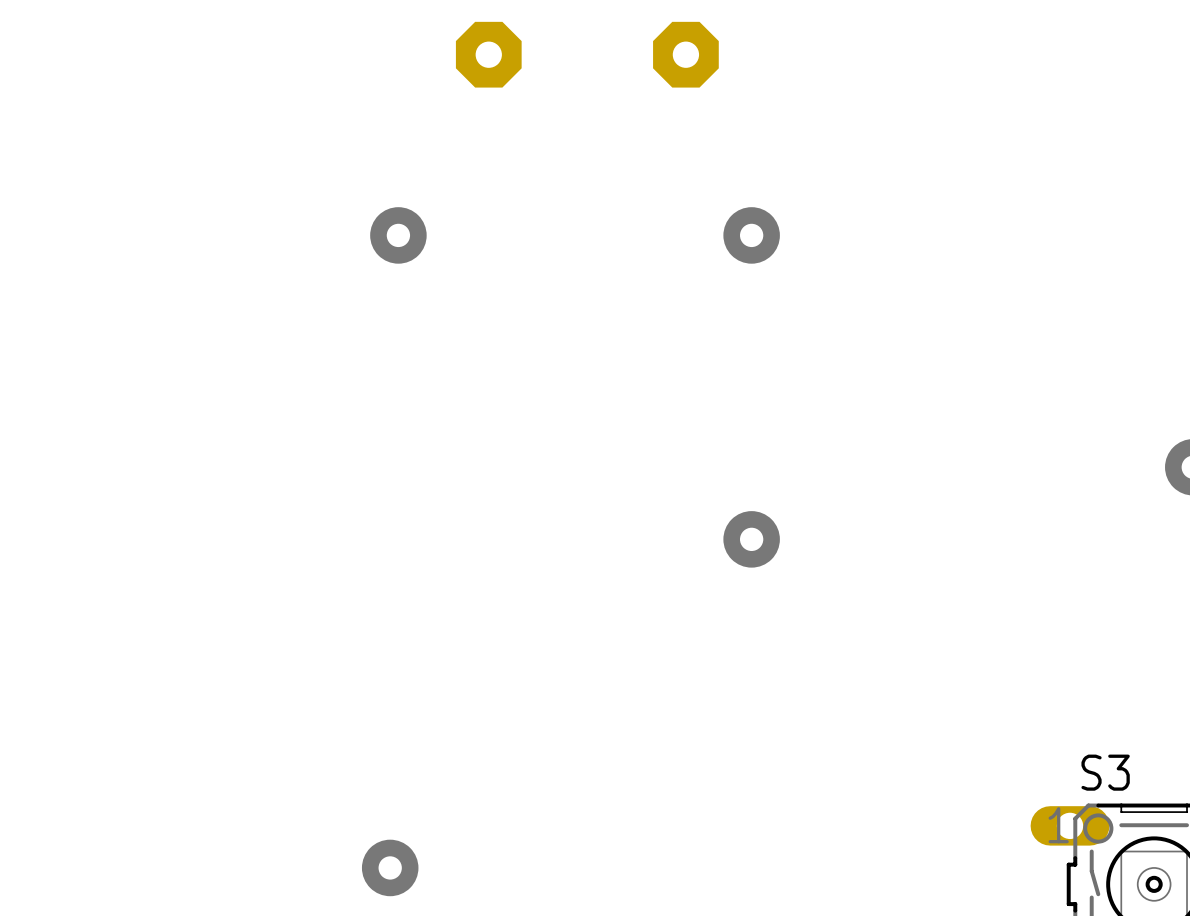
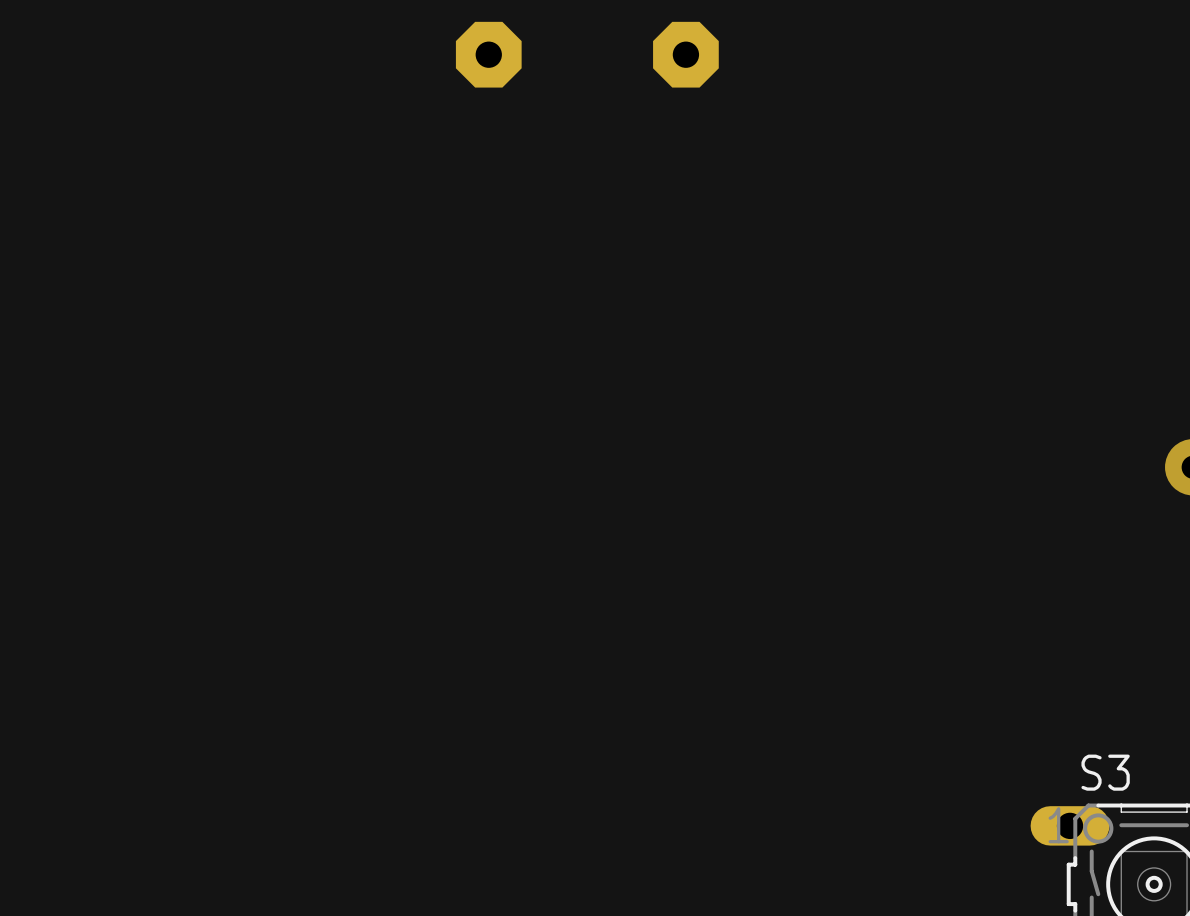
via: (398, 235) -> none
via: (751, 235) -> none
via: (751, 539) -> none
via: (390, 867) -> none

